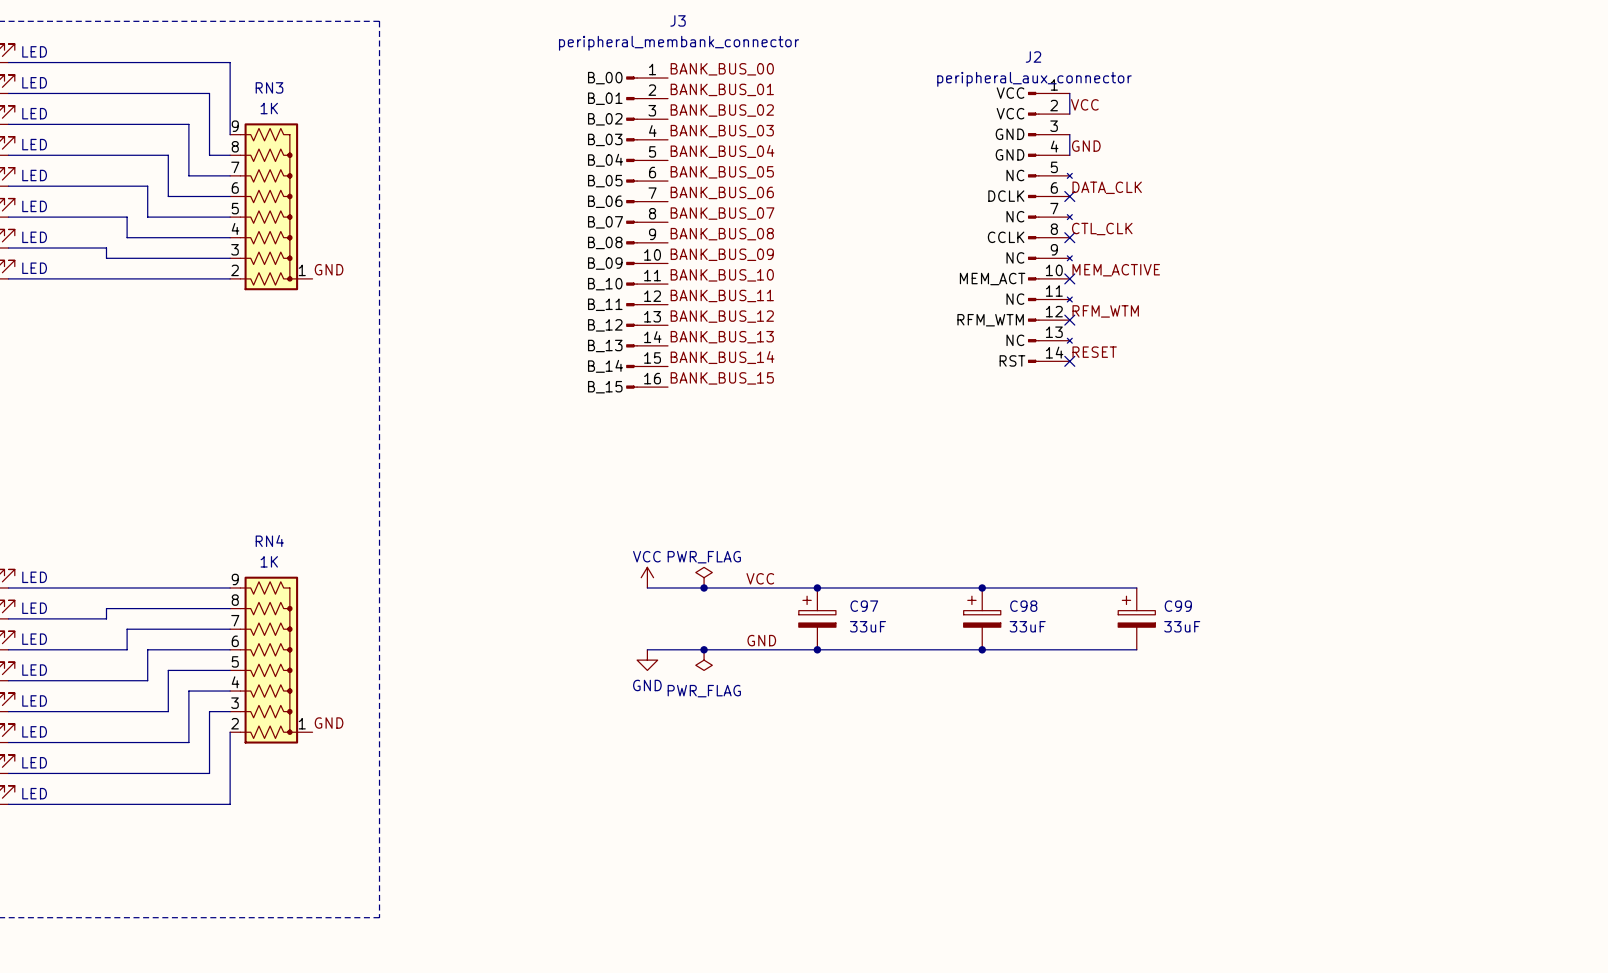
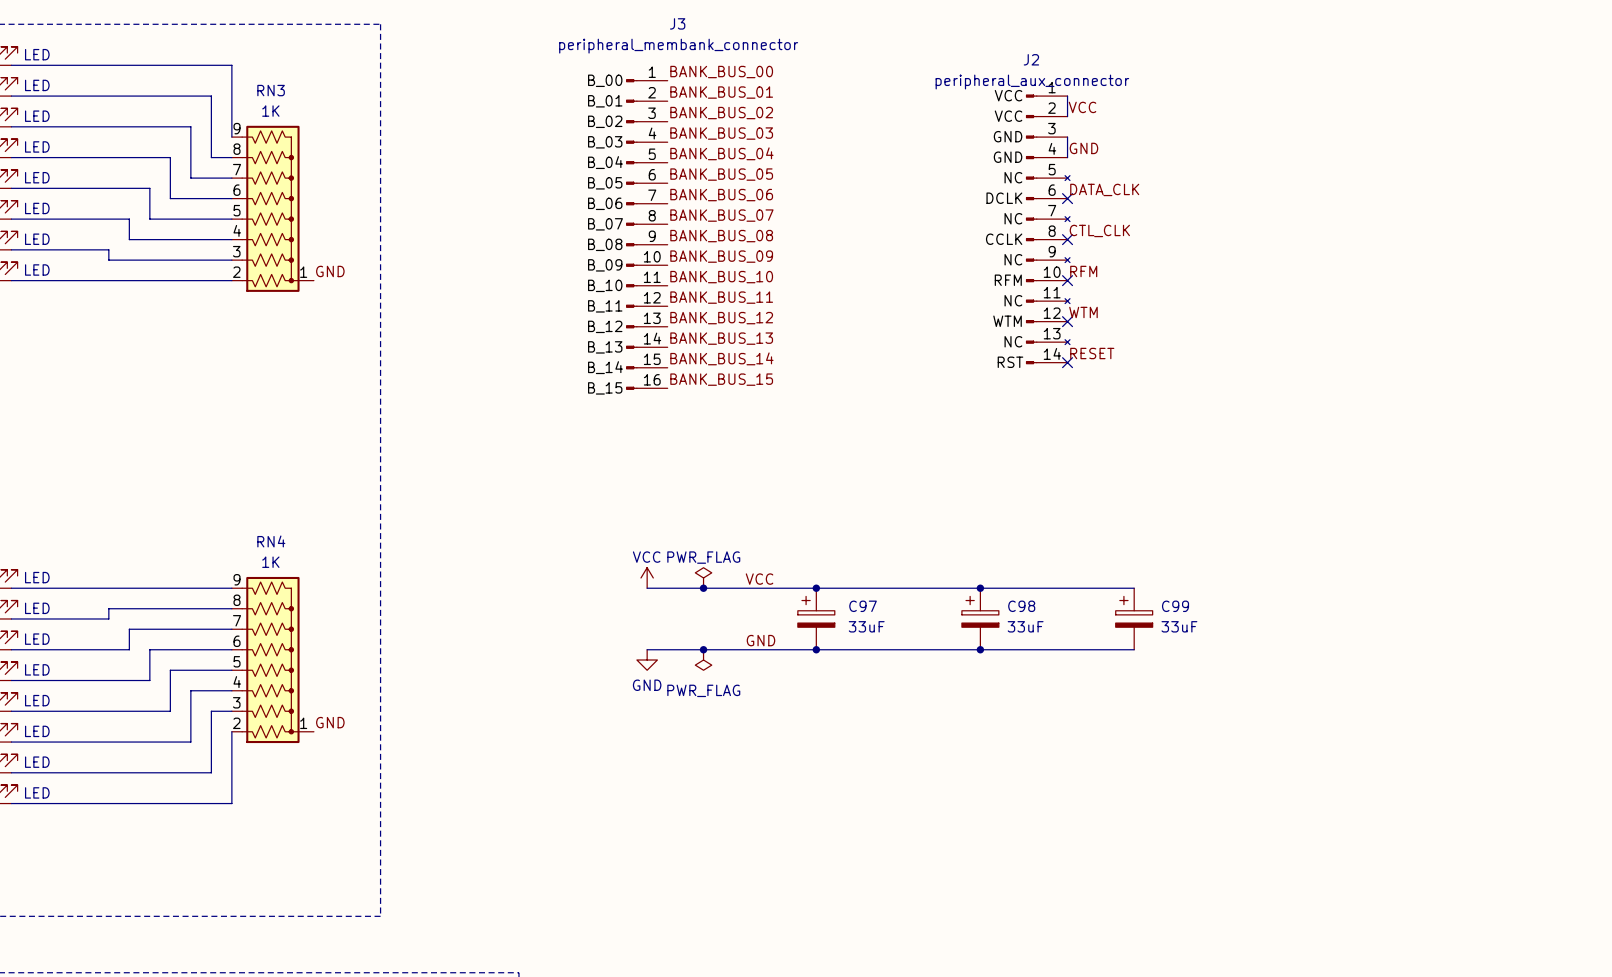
label: MEM_ACTIVE (1116, 270) -> RFM (1083, 271)
J2 pin name: MEM_ACT (992, 279) -> RFM (1008, 280)
label: RFM_WTM (1105, 311) -> WTM (1083, 312)
J2 pin name: RFM_WTM (990, 320) -> WTM (1007, 321)

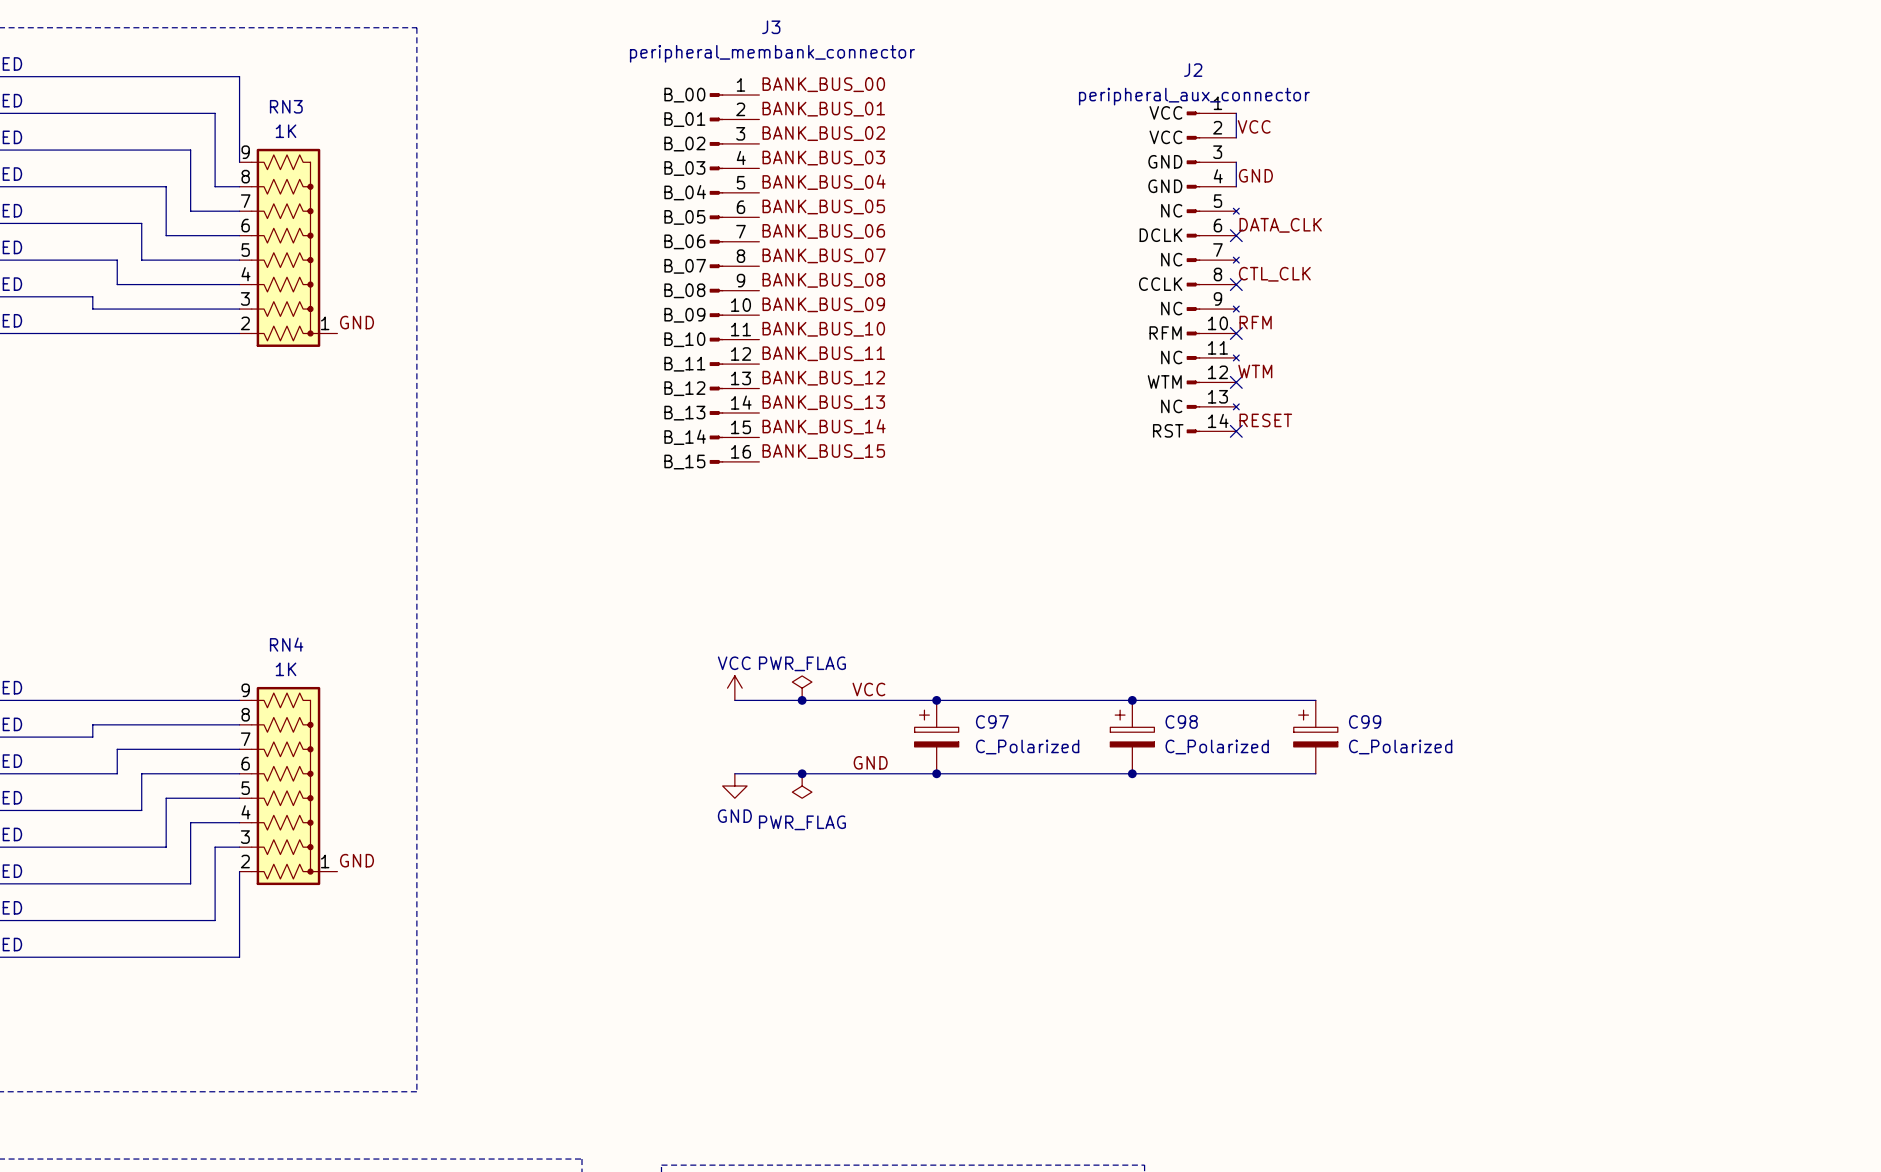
C97 value: 33uF (866, 626) -> C_Polarized (1027, 747)
C98 value: 33uF (1025, 626) -> C_Polarized (1217, 747)
C99 value: 33uF (1179, 626) -> C_Polarized (1400, 747)

